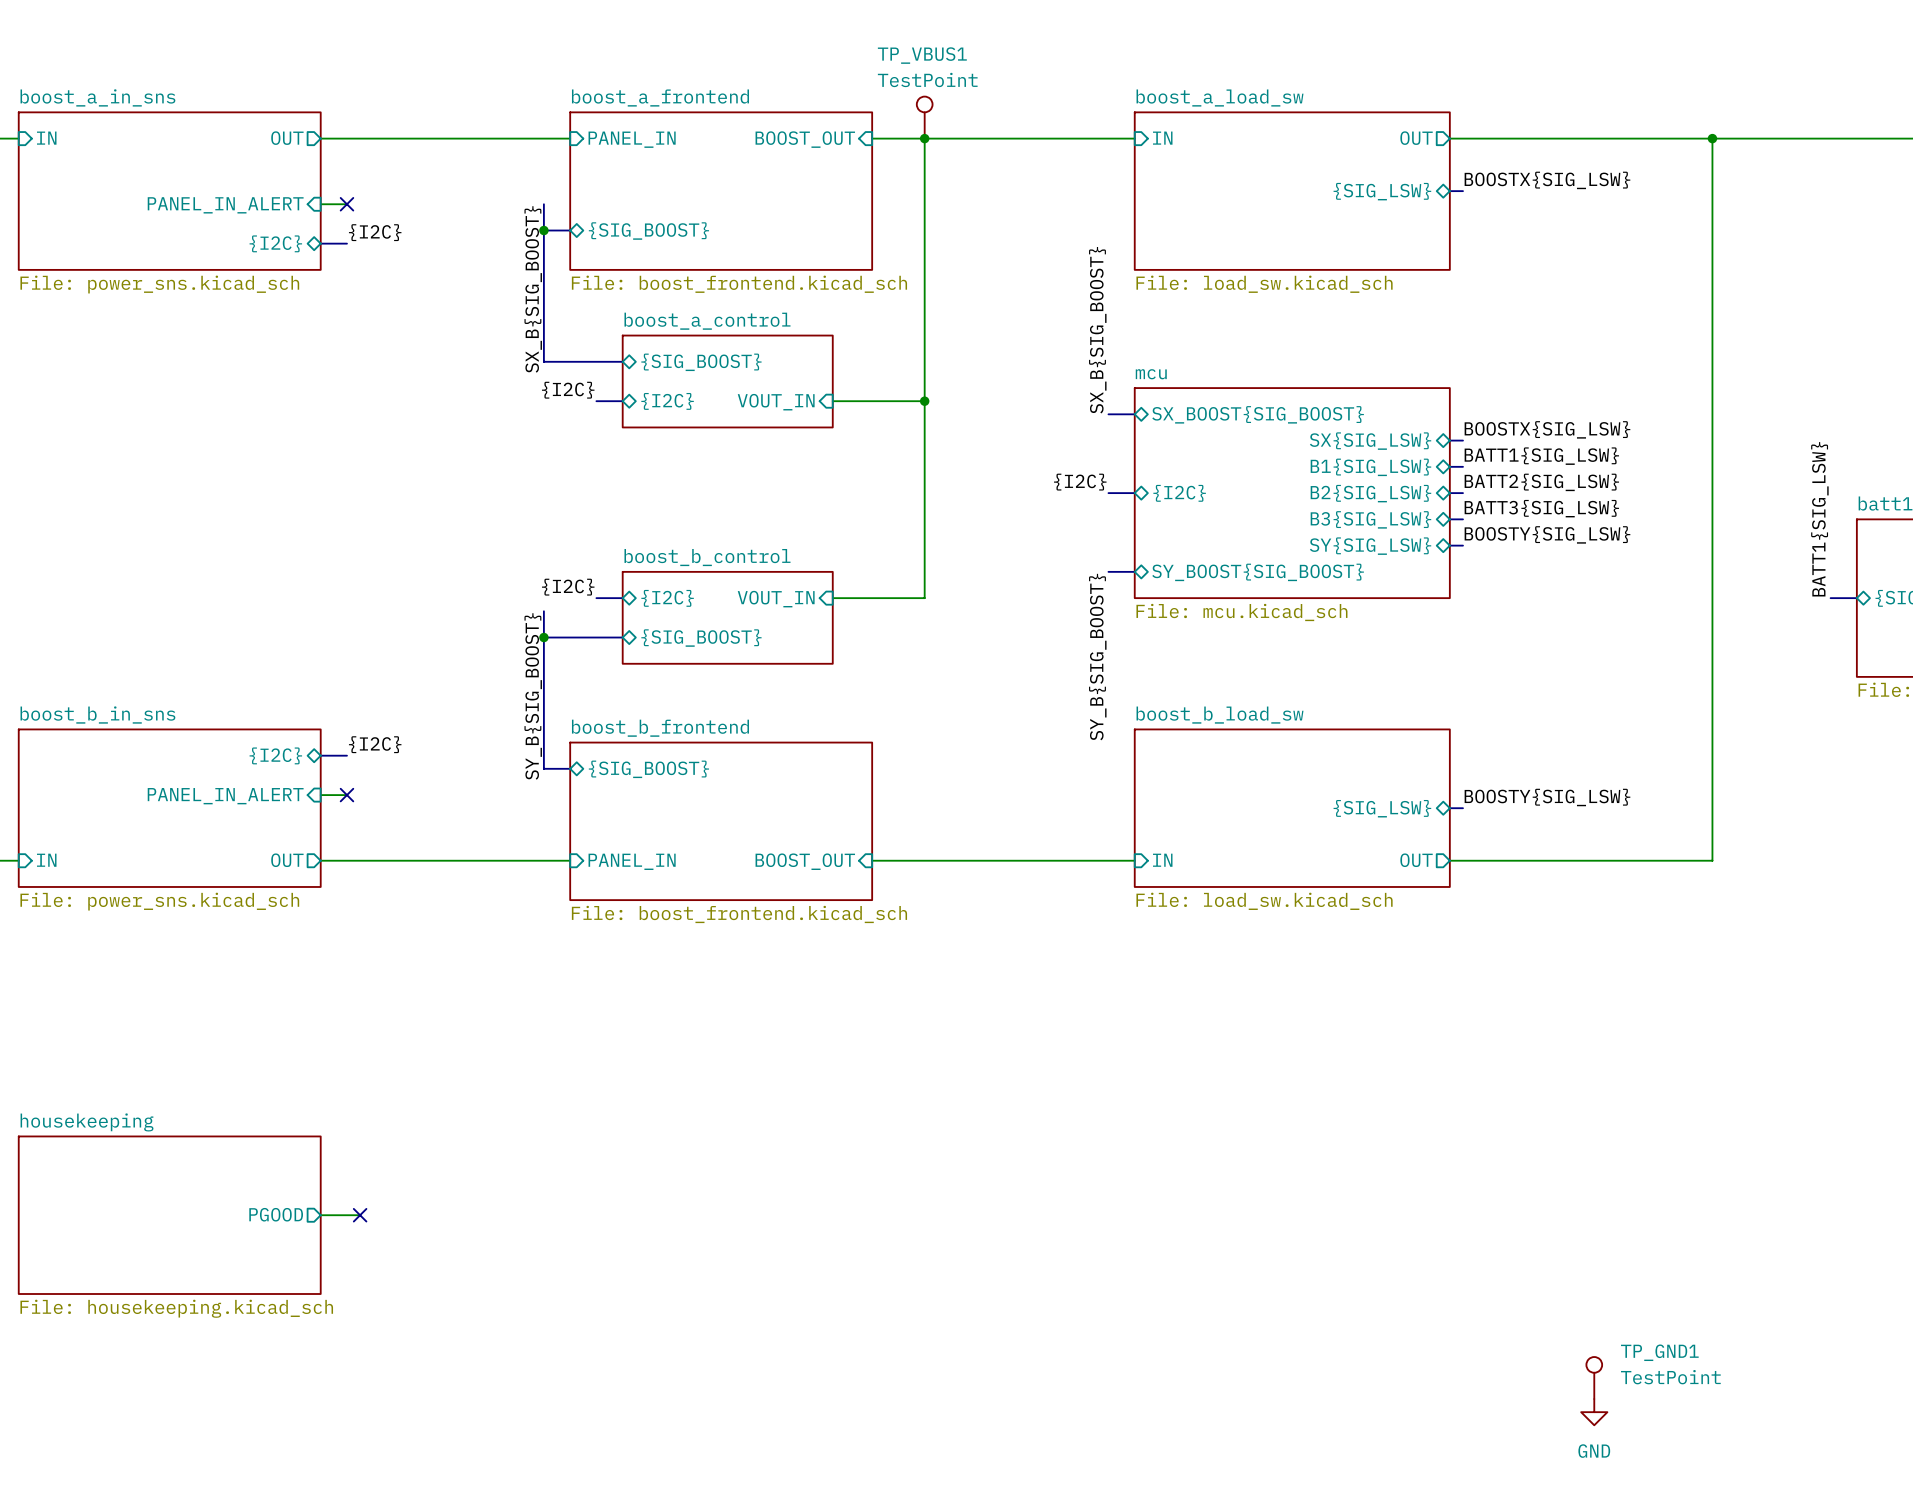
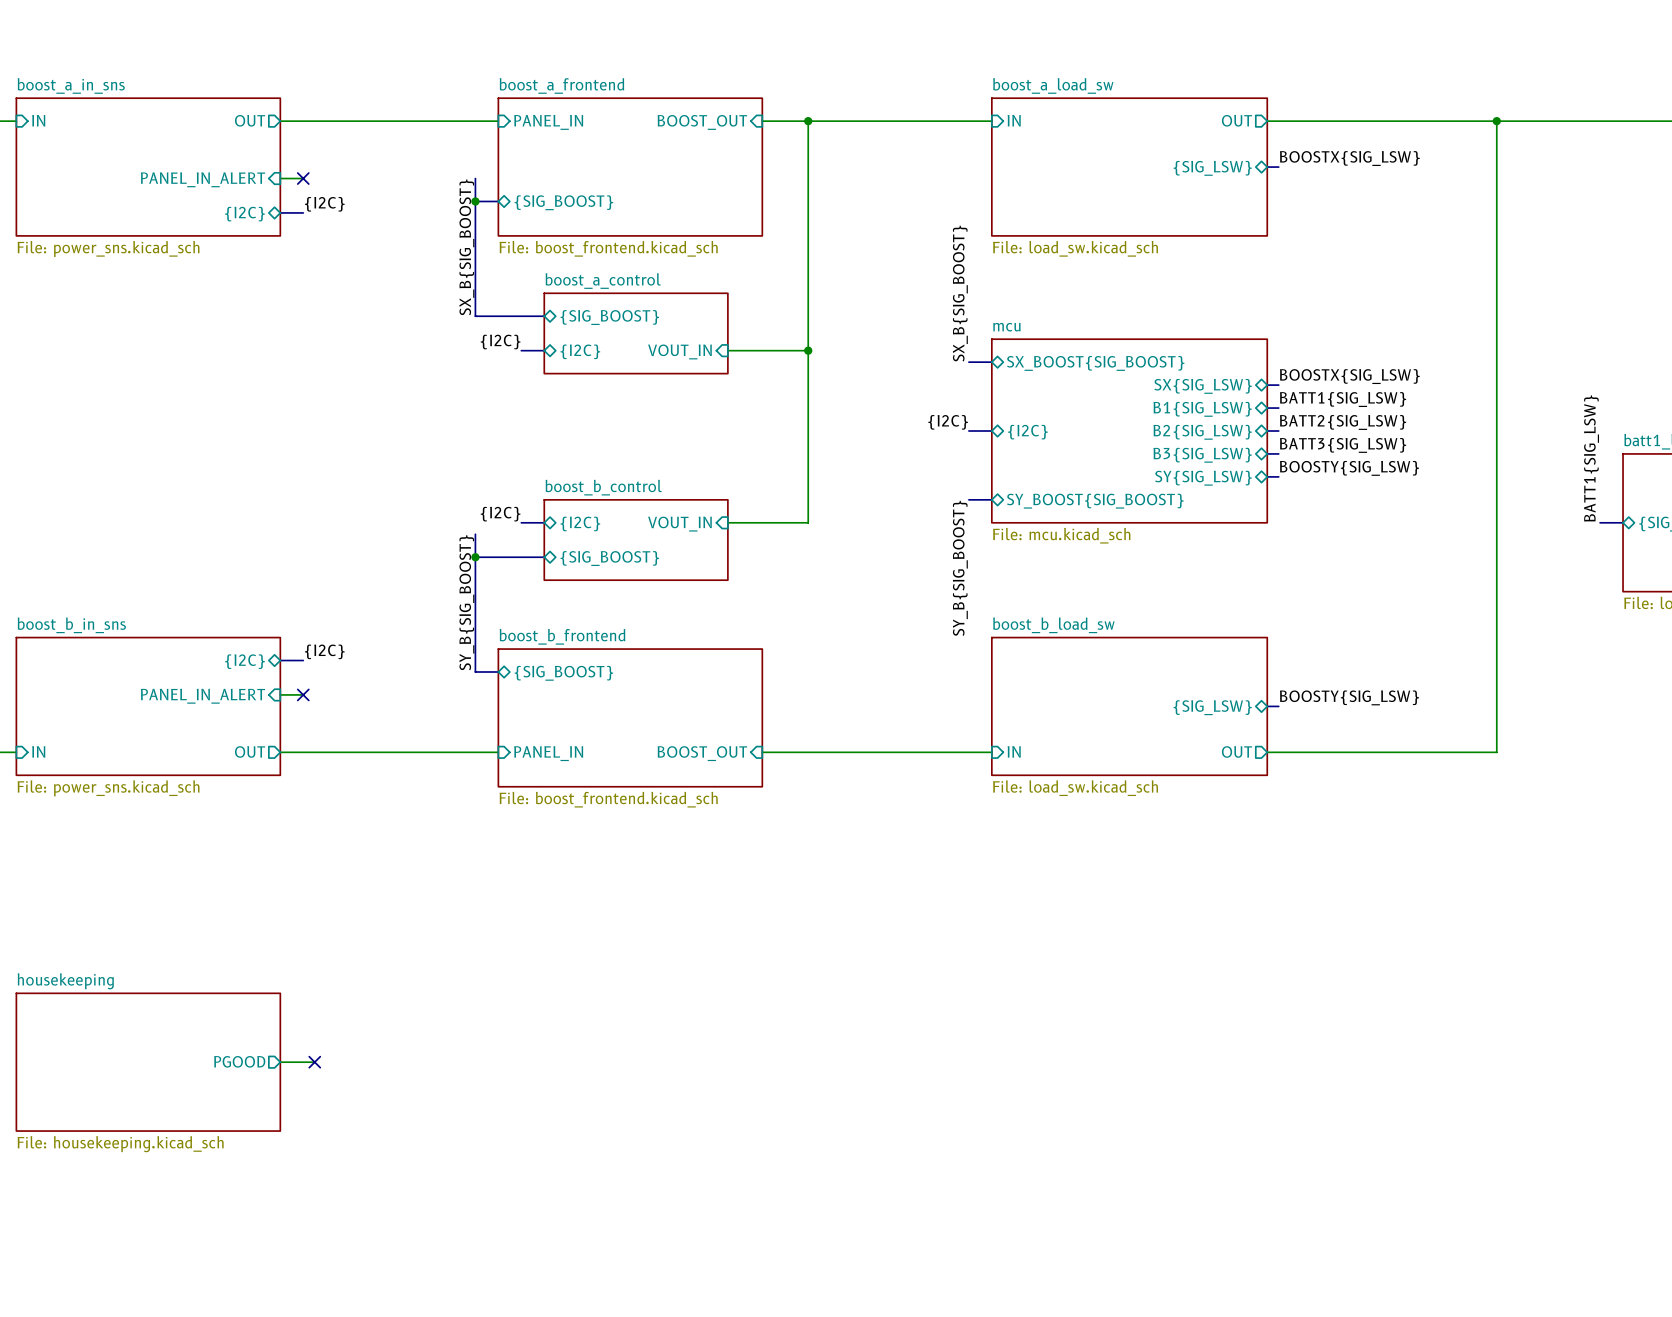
TP_VBUS1: TestPoint (924, 117) -> none
TP_GND1: TestPoint (1594, 1378) -> none
power symbol: GND (1594, 1412) -> none

